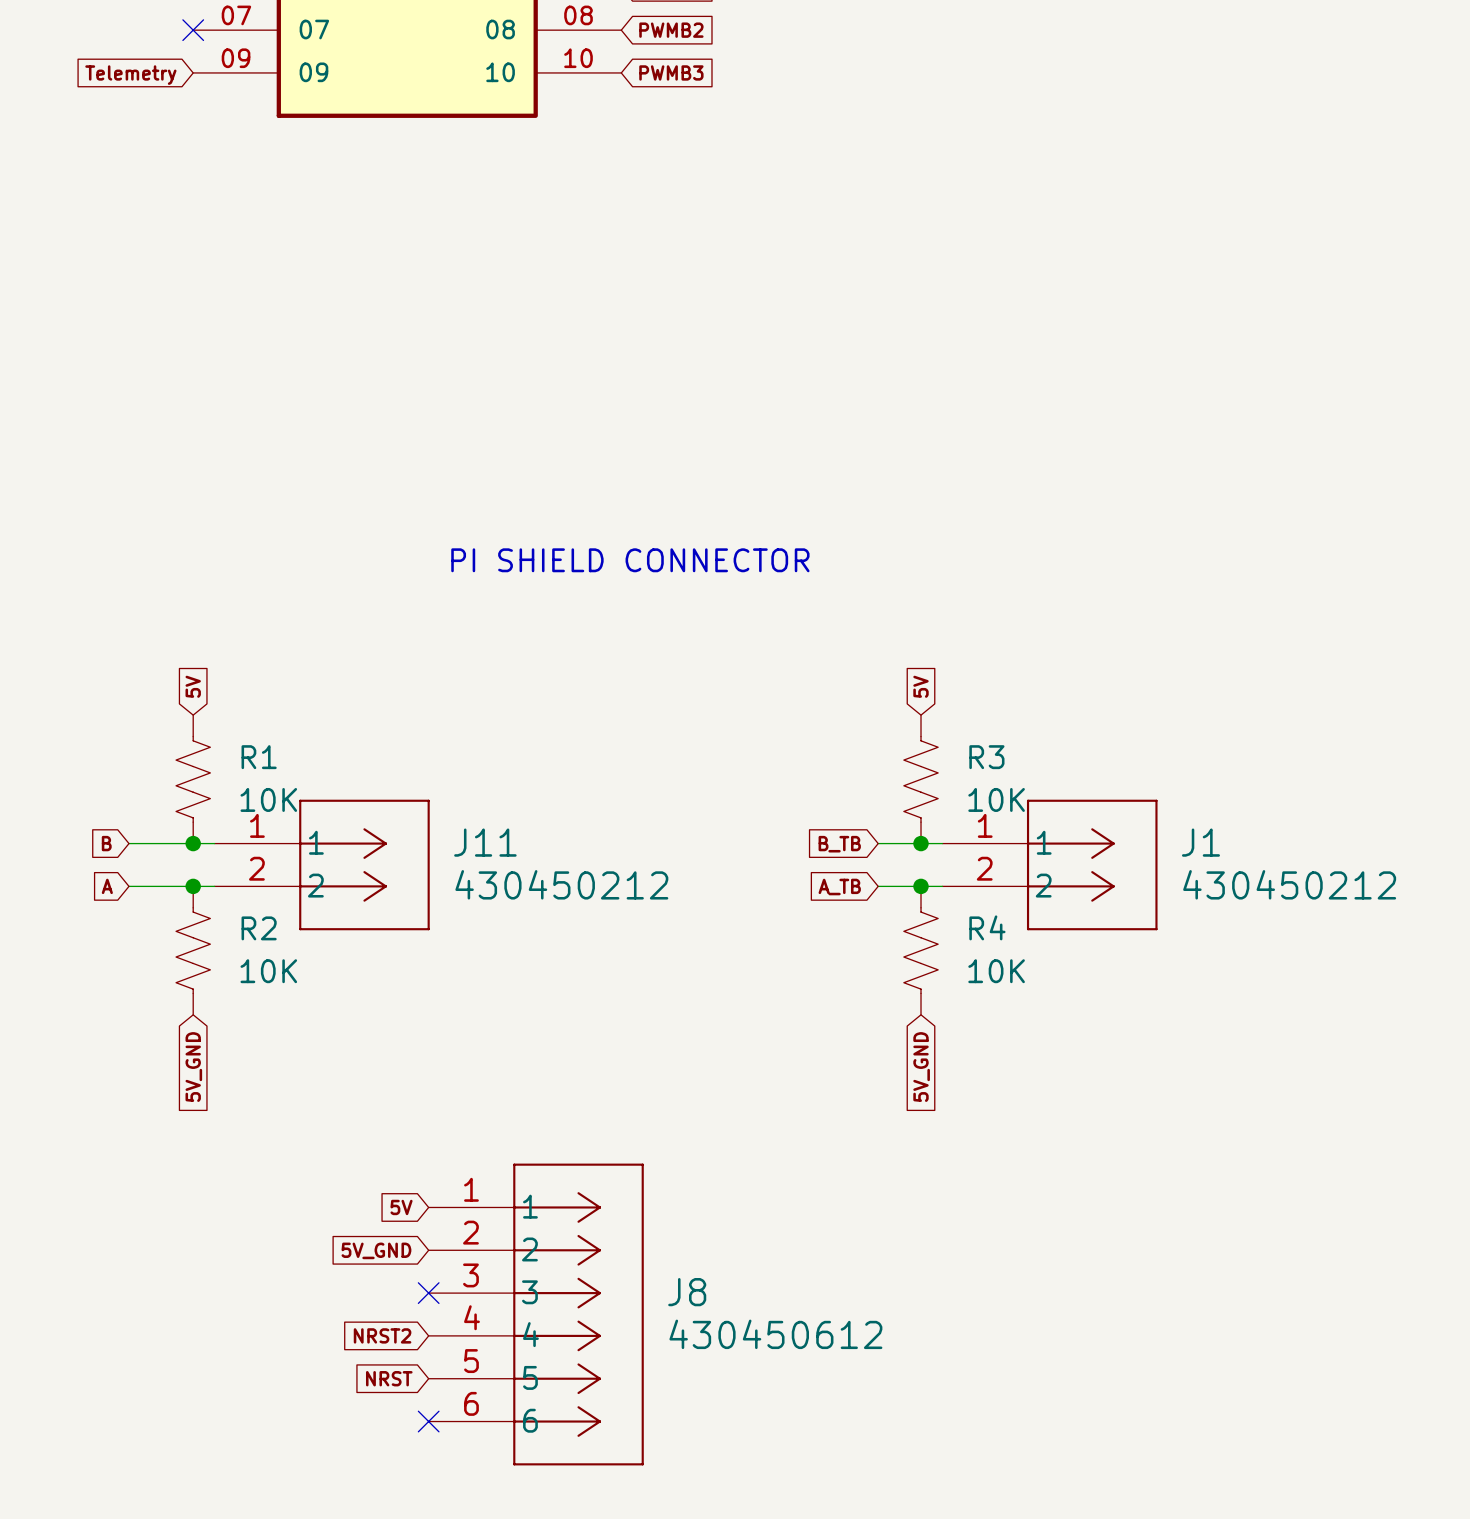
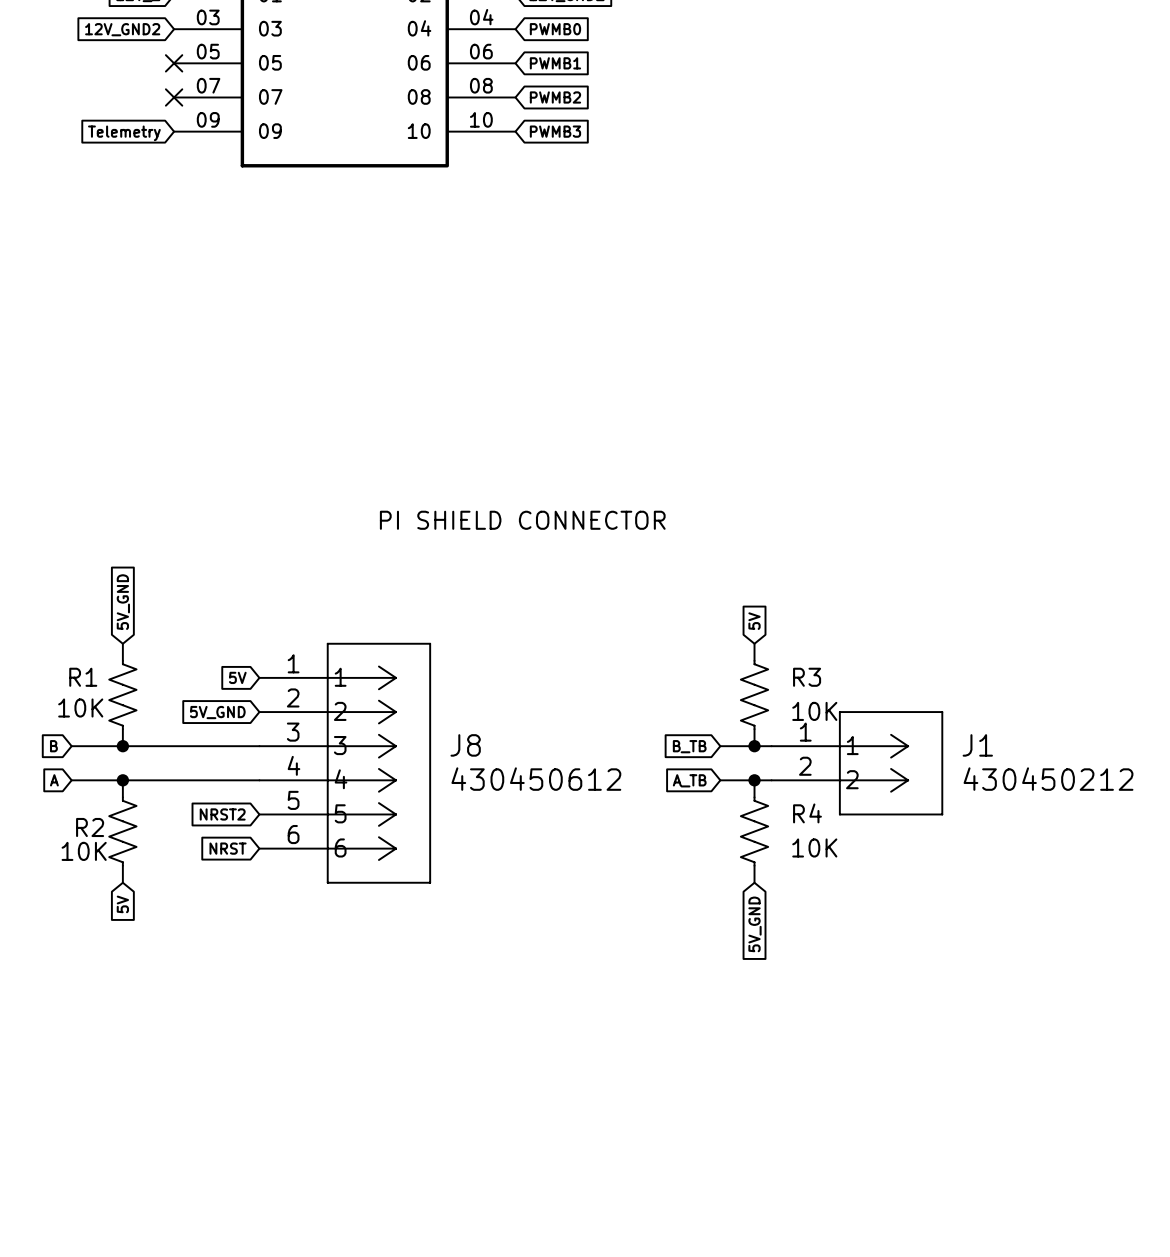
global label: none -> 5V_GND (123, 602)
global label rotation: 0° (193, 686) -> 90° counterclockwise (237, 677)
global label position: 5V (193, 686) -> 5V (237, 677)
R1 name position: R1 (259, 757) -> R1 (83, 677)
R1 position: (193, 779) -> (122, 694)
R1 value position: 10K (268, 799) -> 10K (80, 707)
global label: none -> 5V_GND (217, 712)
wire: none -> (71, 746) (122, 746)
global label position: B (106, 843) -> B (53, 746)
junction: none -> (122, 746)
junction: (193, 843) -> none
J11: 430450212 (322, 864) -> none
wire: none -> (71, 780) (122, 780)
global label position: A (107, 886) -> A (54, 780)
junction: none -> (122, 780)
junction: (193, 886) -> none
R2 name position: R2 (259, 928) -> R2 (90, 827)
global label: none -> NRST2 (222, 814)
R2 position: (193, 950) -> (122, 831)
R2 value position: 10K (268, 971) -> 10K (84, 851)
global label: none -> NRST (228, 848)
global label: none -> 5V (122, 904)
global label: 5V_GND (193, 1067) -> none
global label: 5V (401, 1207) -> none
global label: 5V_GND (376, 1250) -> none
no-connect mark: (428, 1293) -> none
J8 position: (536, 1314) -> (345, 763)
global label: NRST2 (382, 1335) -> none
global label: NRST (389, 1378) -> none
no-connect mark: (428, 1421) -> none

